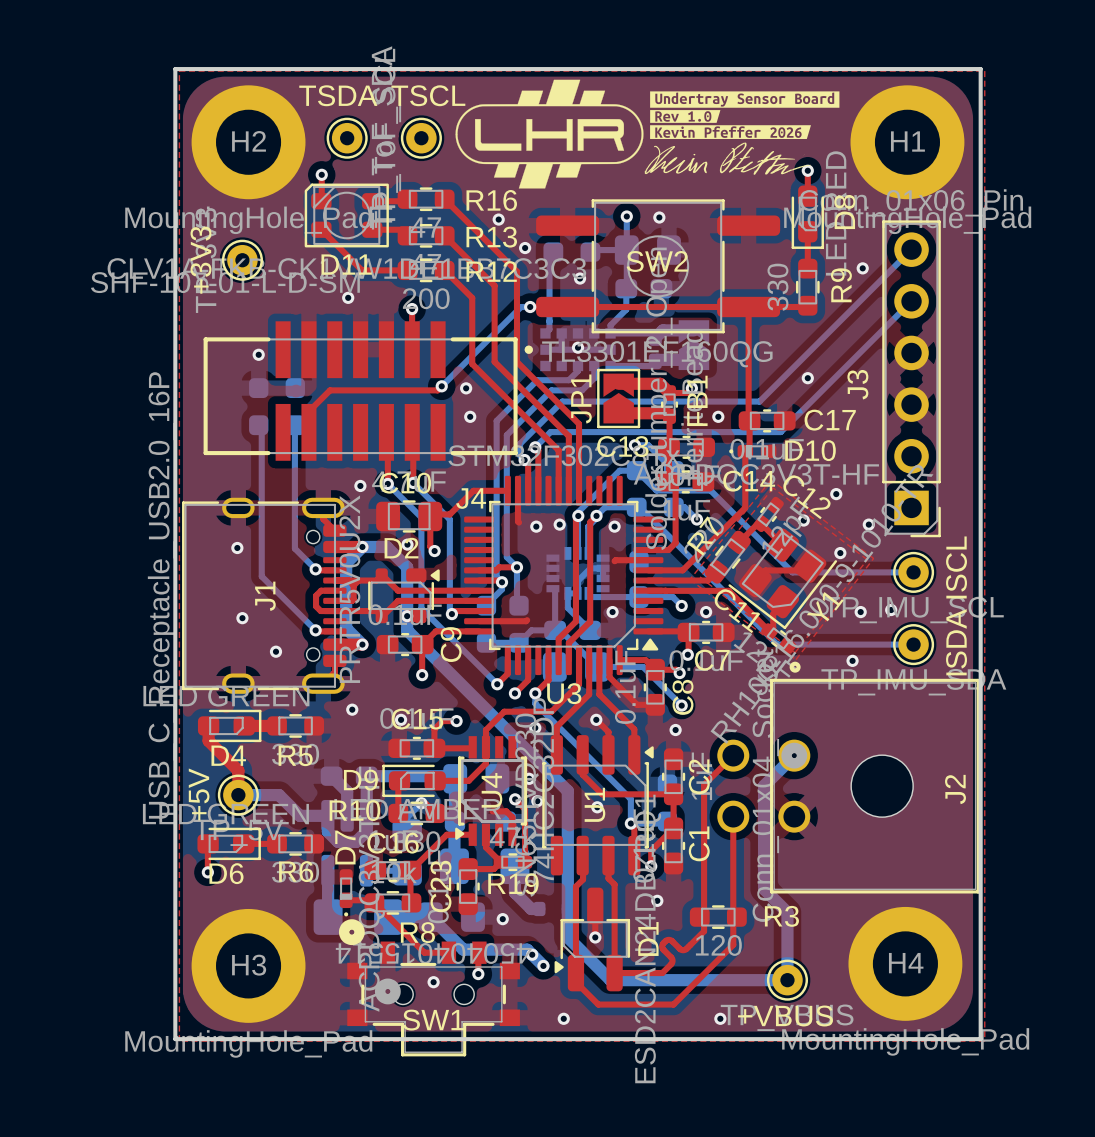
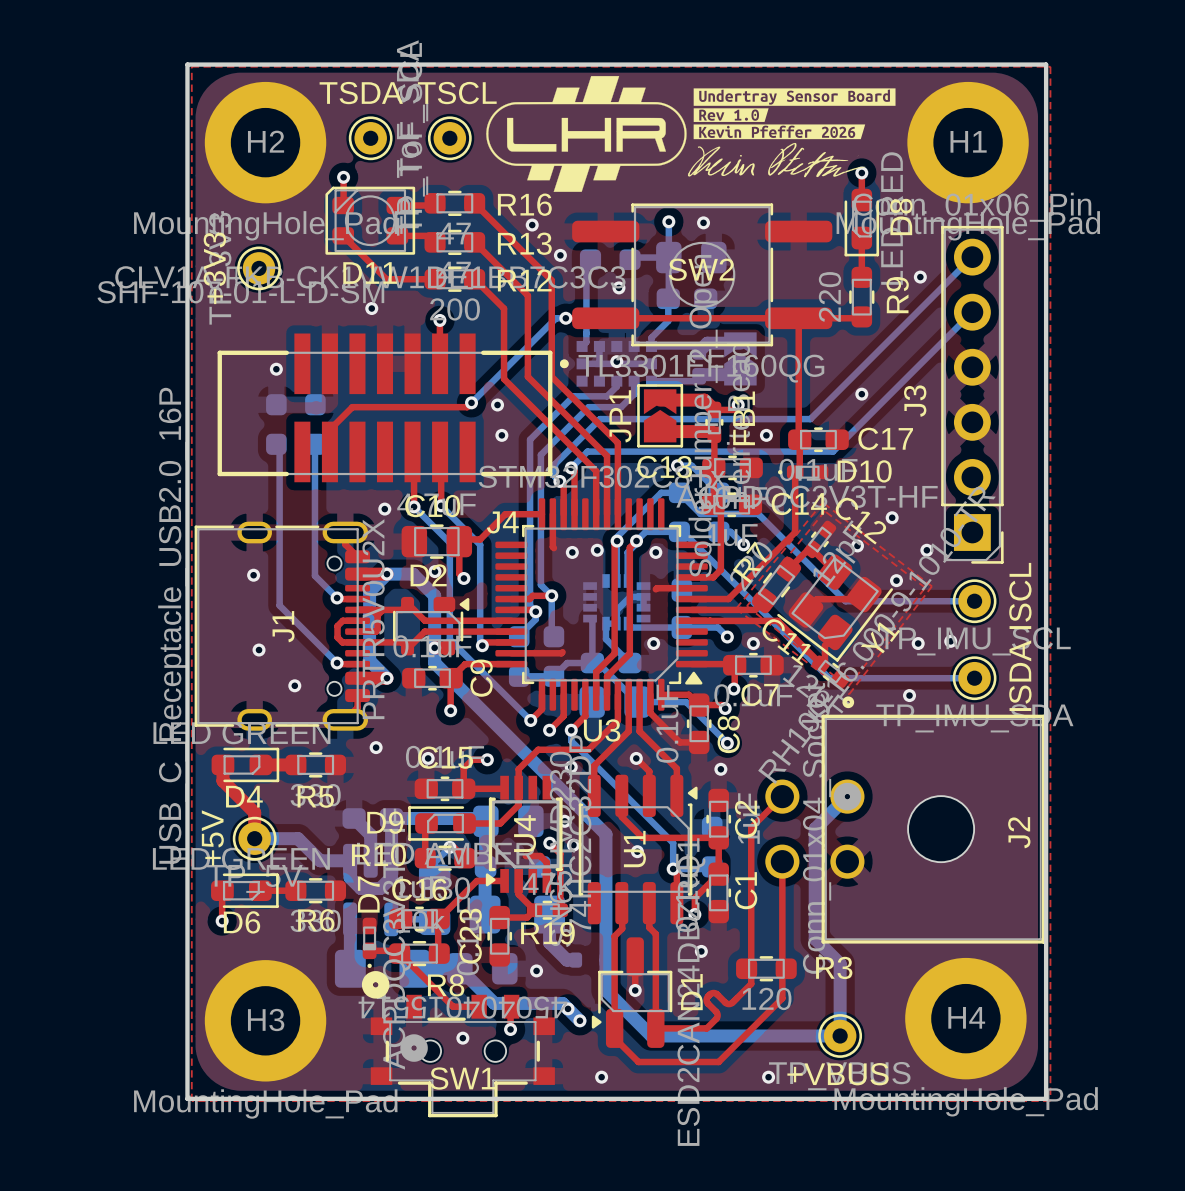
R9 value: 330 (777, 287) -> 220 (829, 296)

